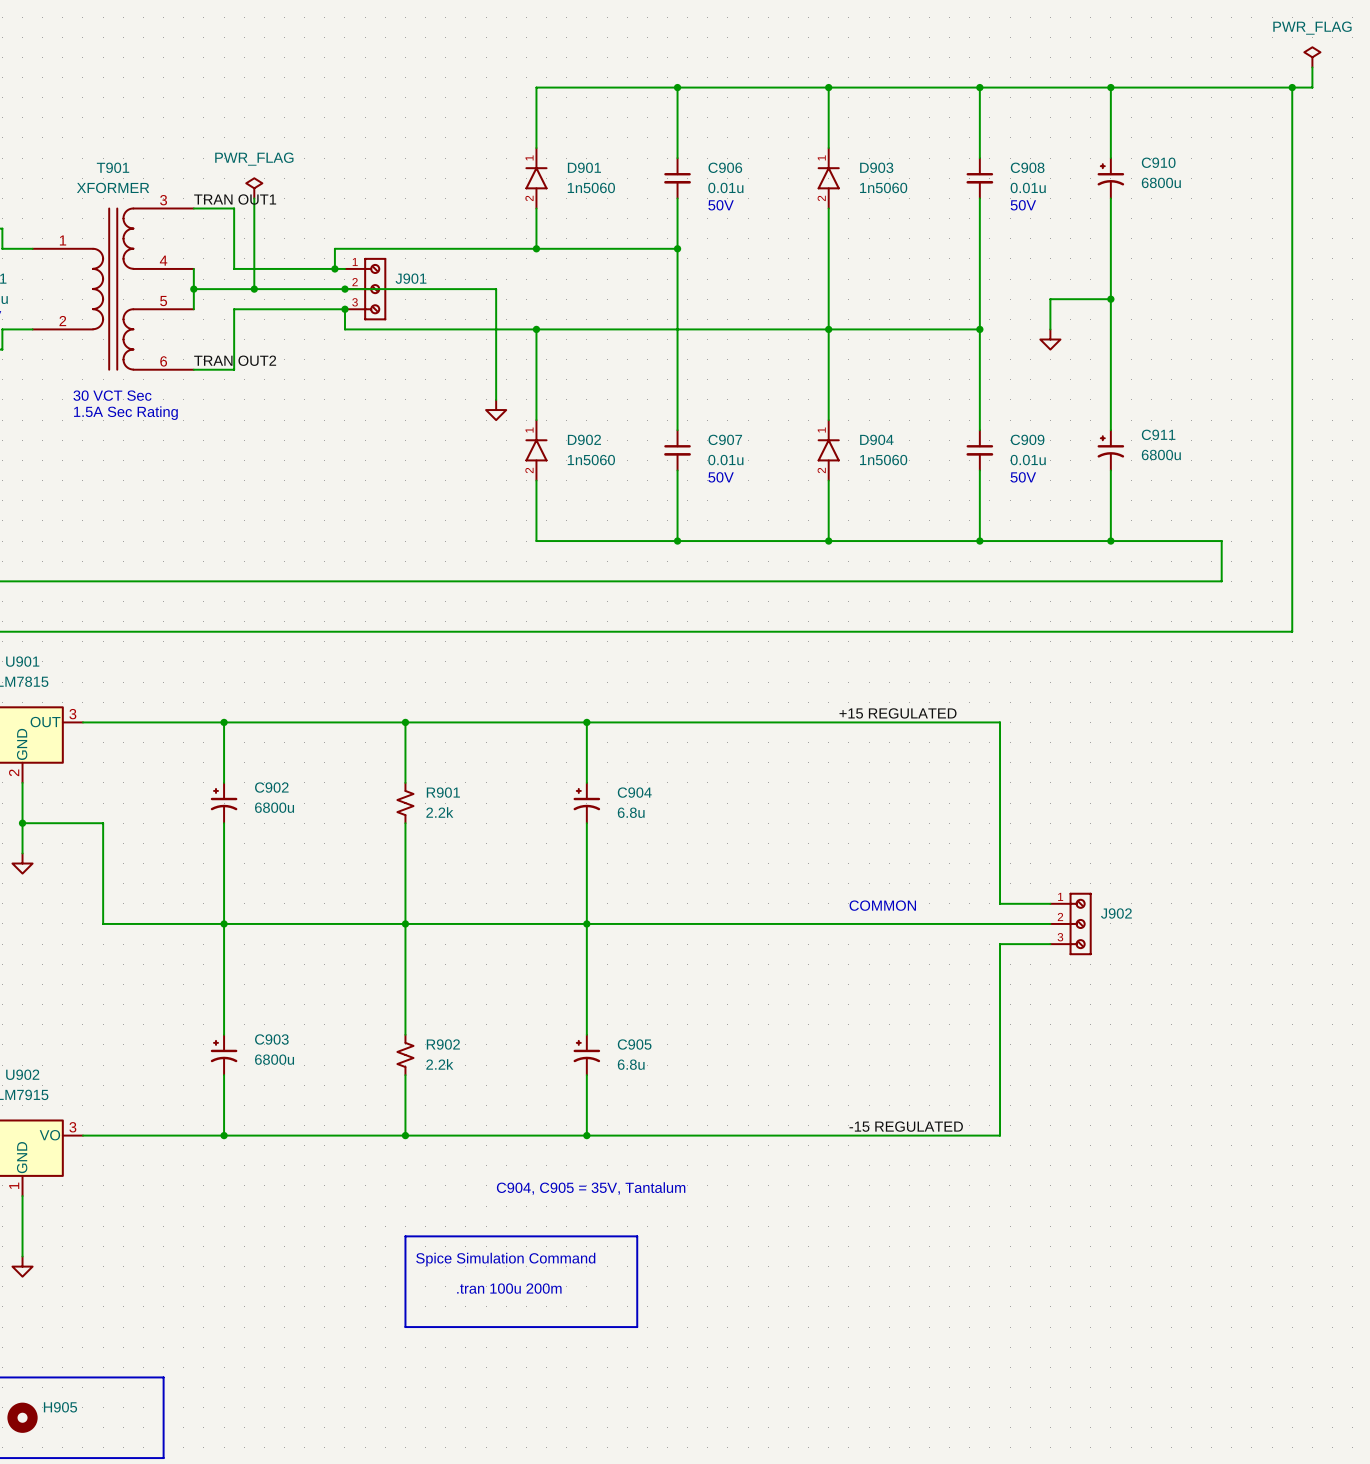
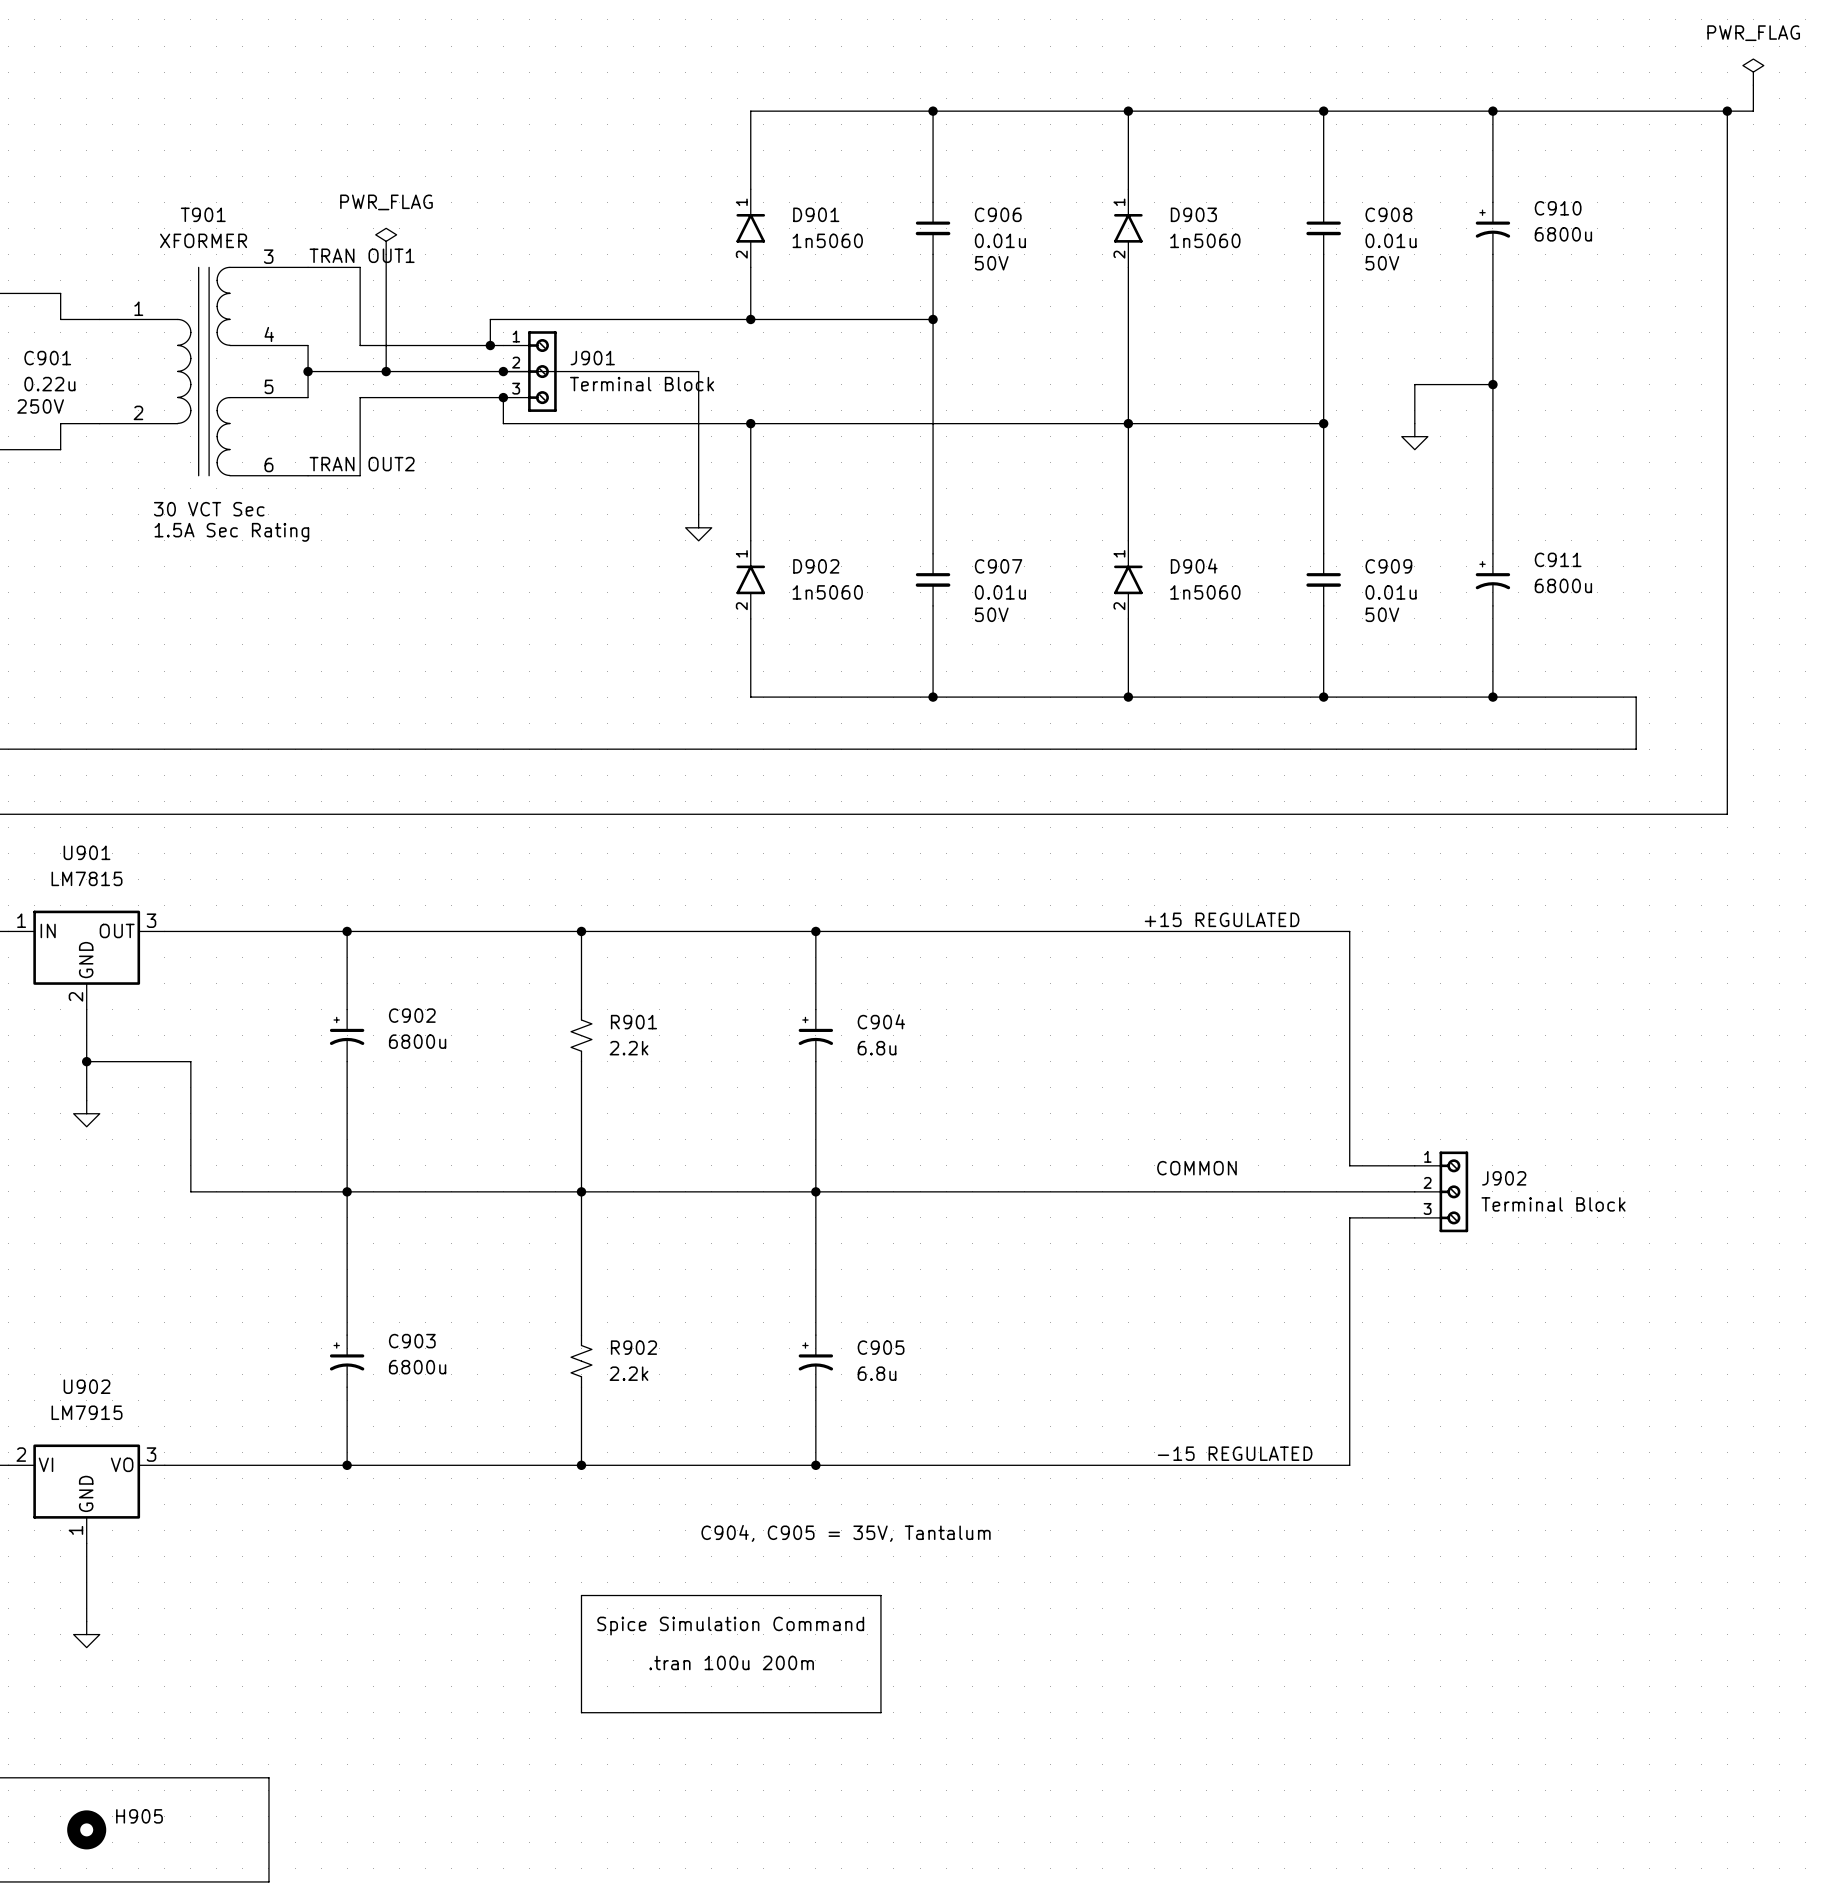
J901 value: none -> Terminal Block (642, 384)
J902 value: none -> Terminal Block (1553, 1204)

